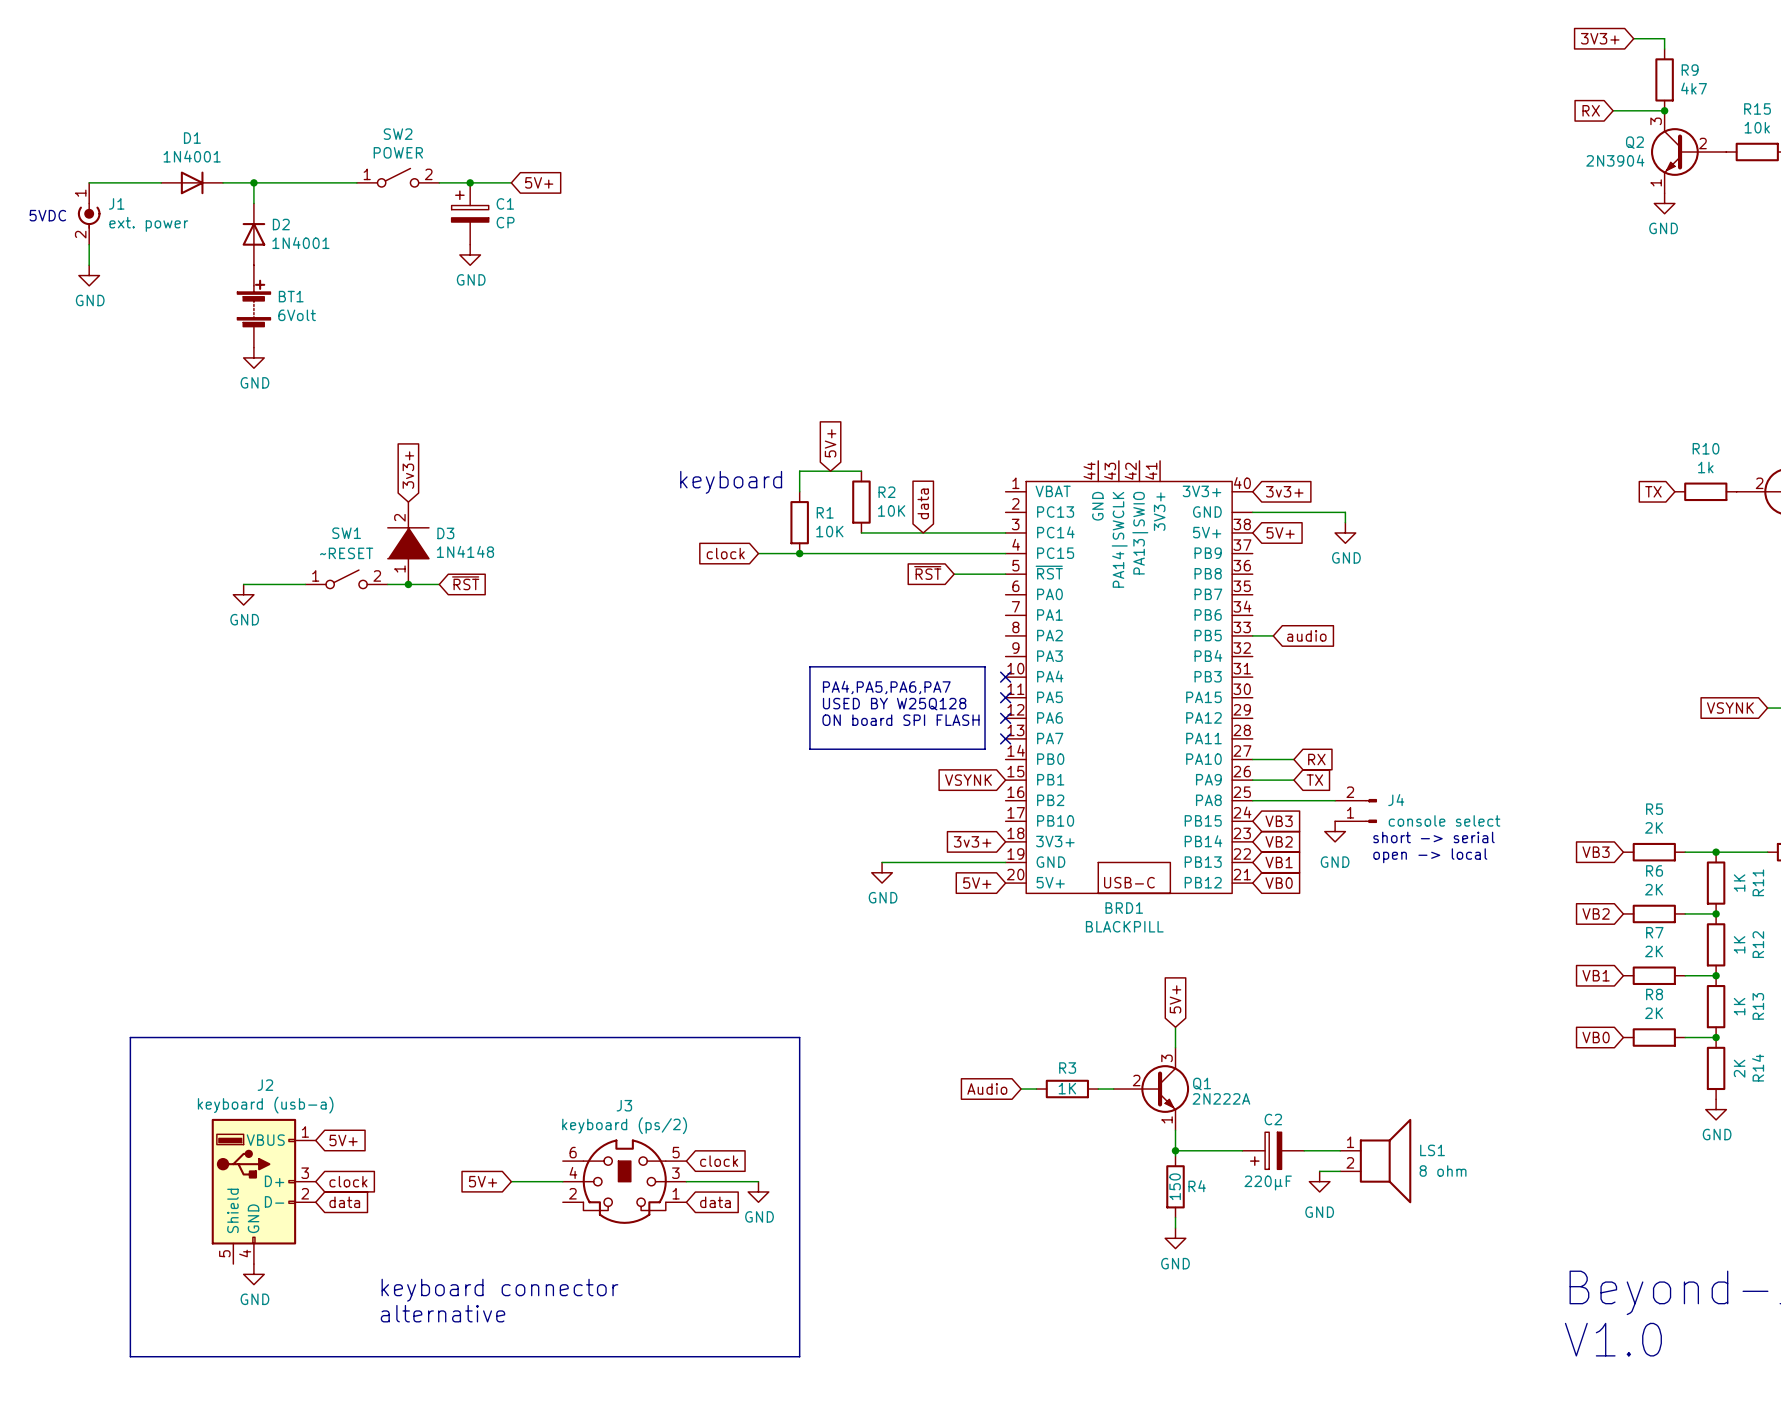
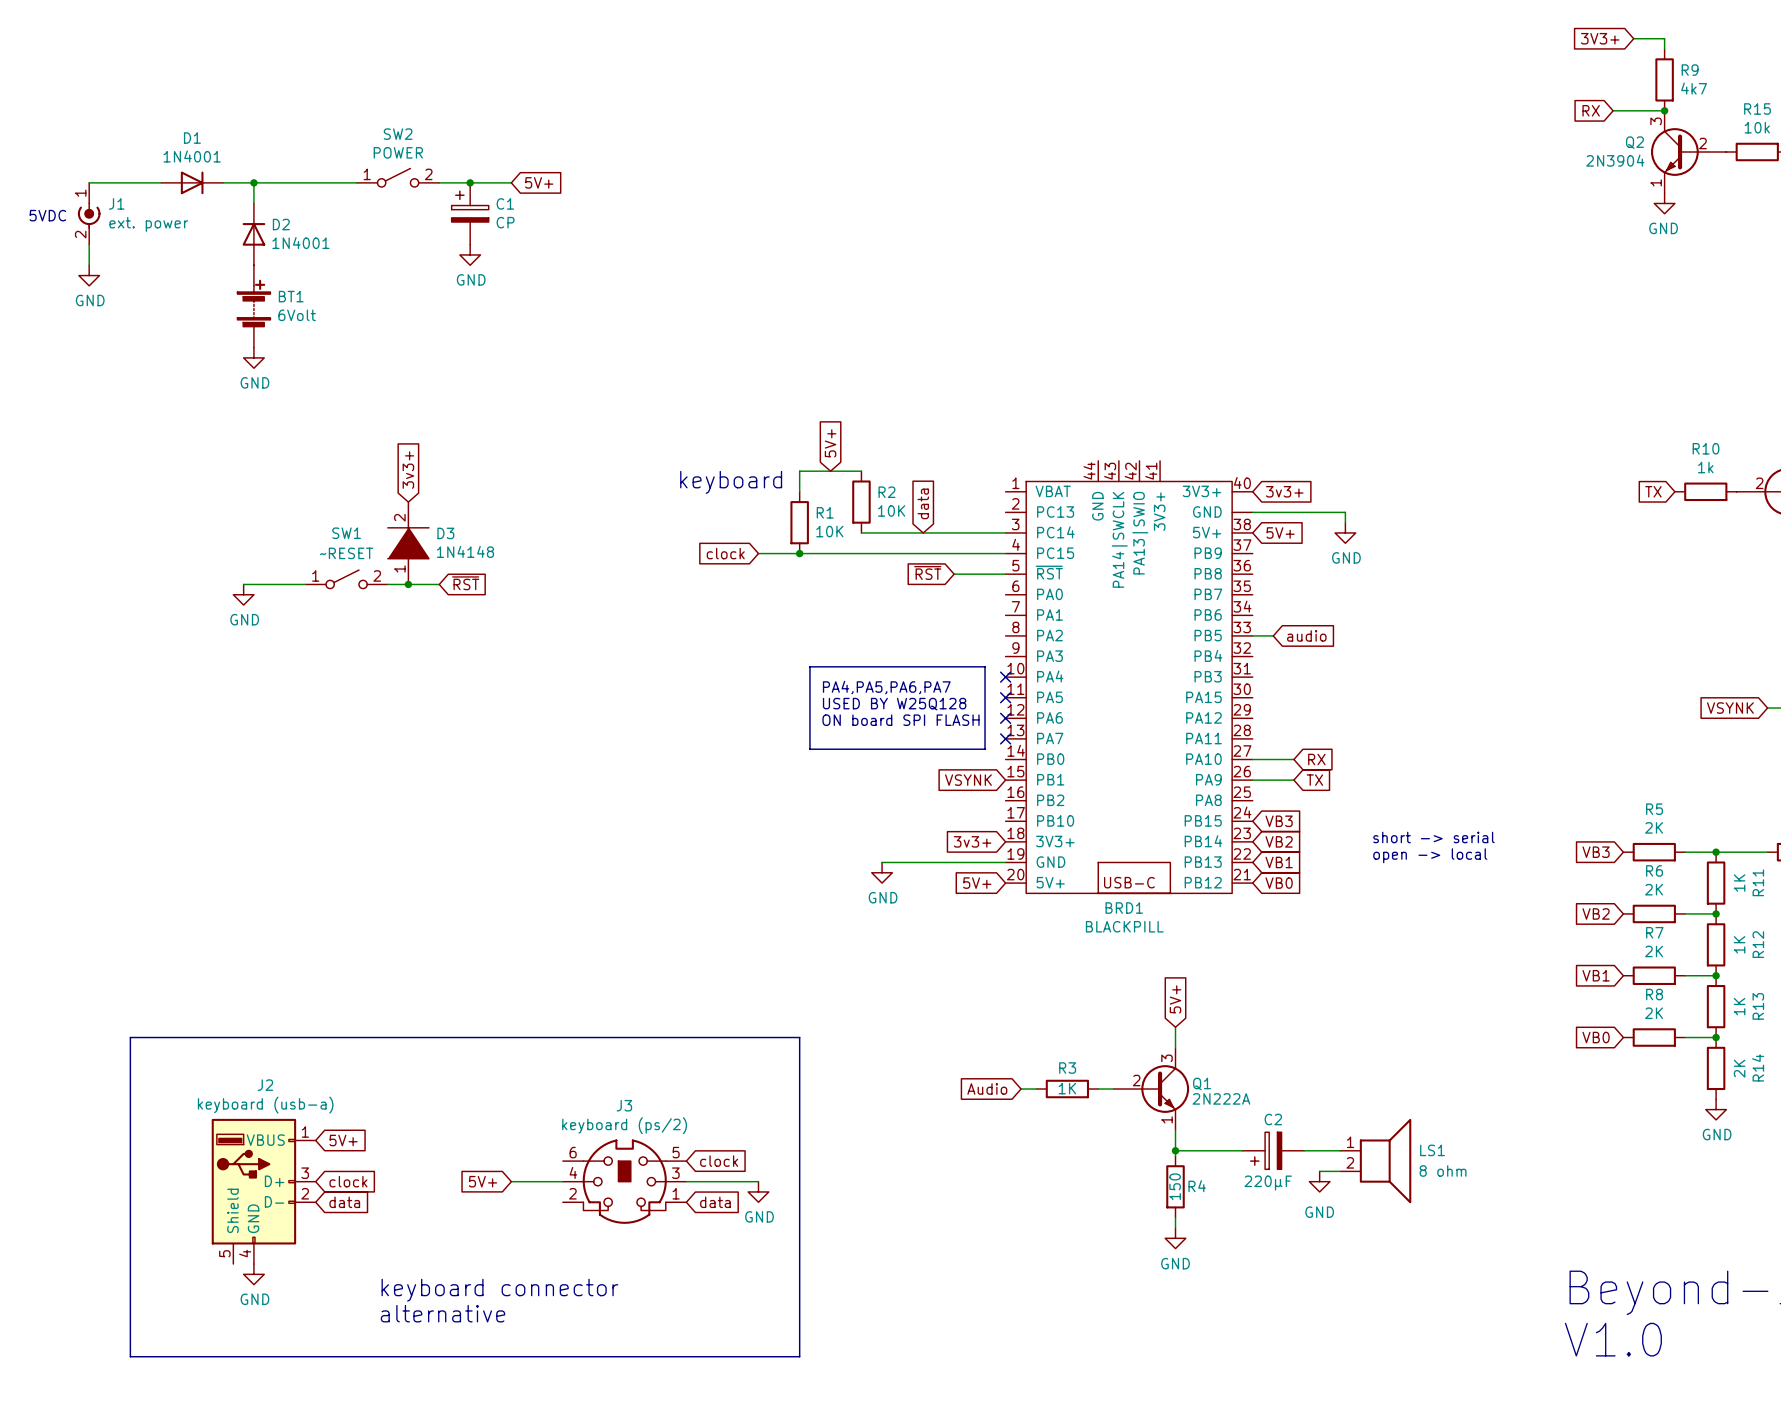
wire: (1252, 800) (1335, 800) -> none
J4: console select (1356, 810) -> none
power symbol: GND (1335, 831) -> none

